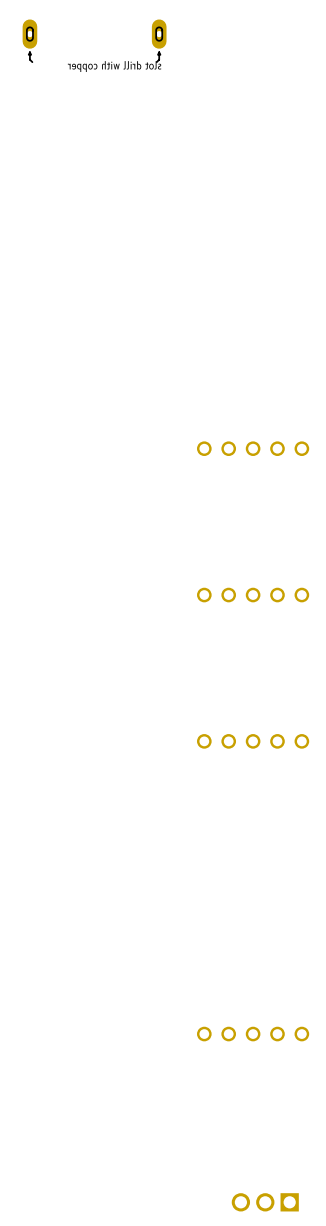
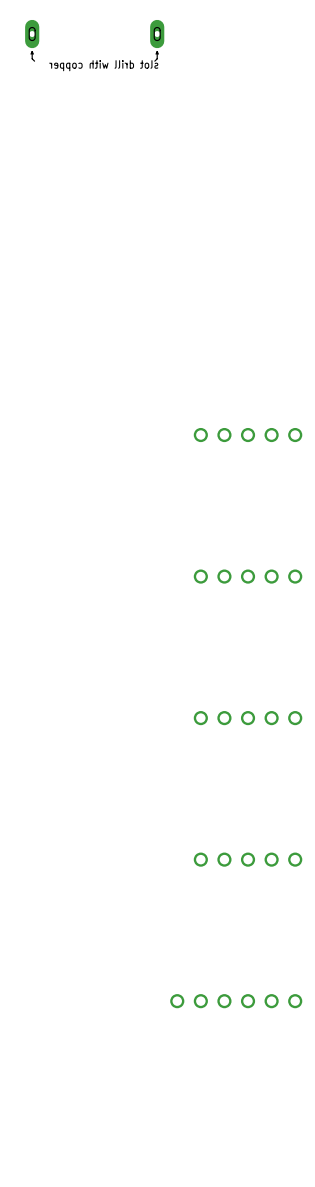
part: none -> (236, 1001)
part position: (253, 1034) -> (248, 859)
part: (265, 1202) -> none

